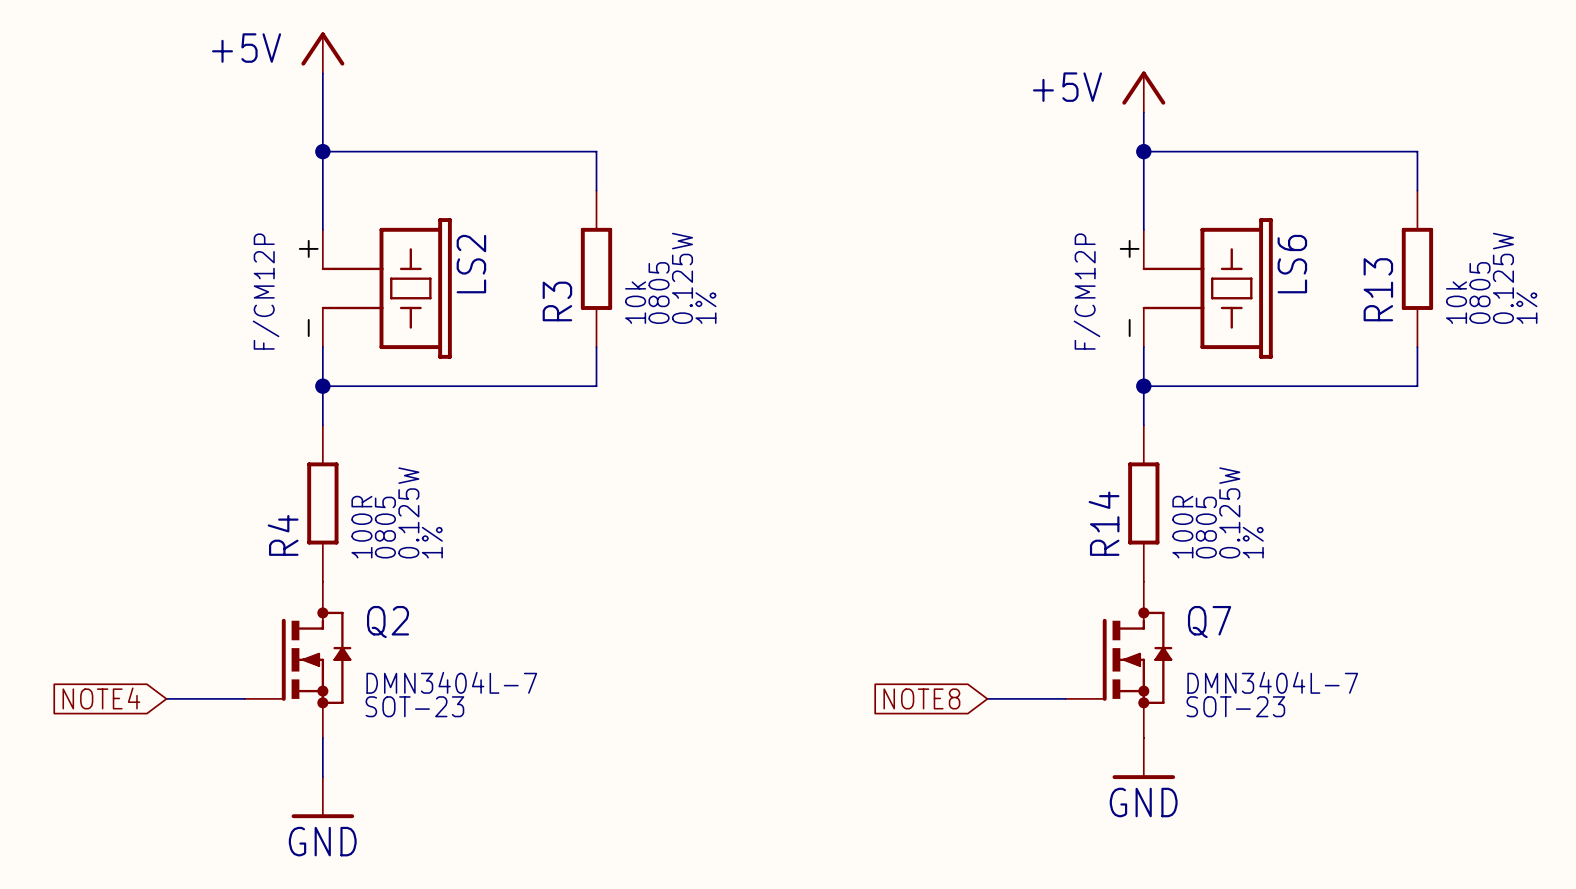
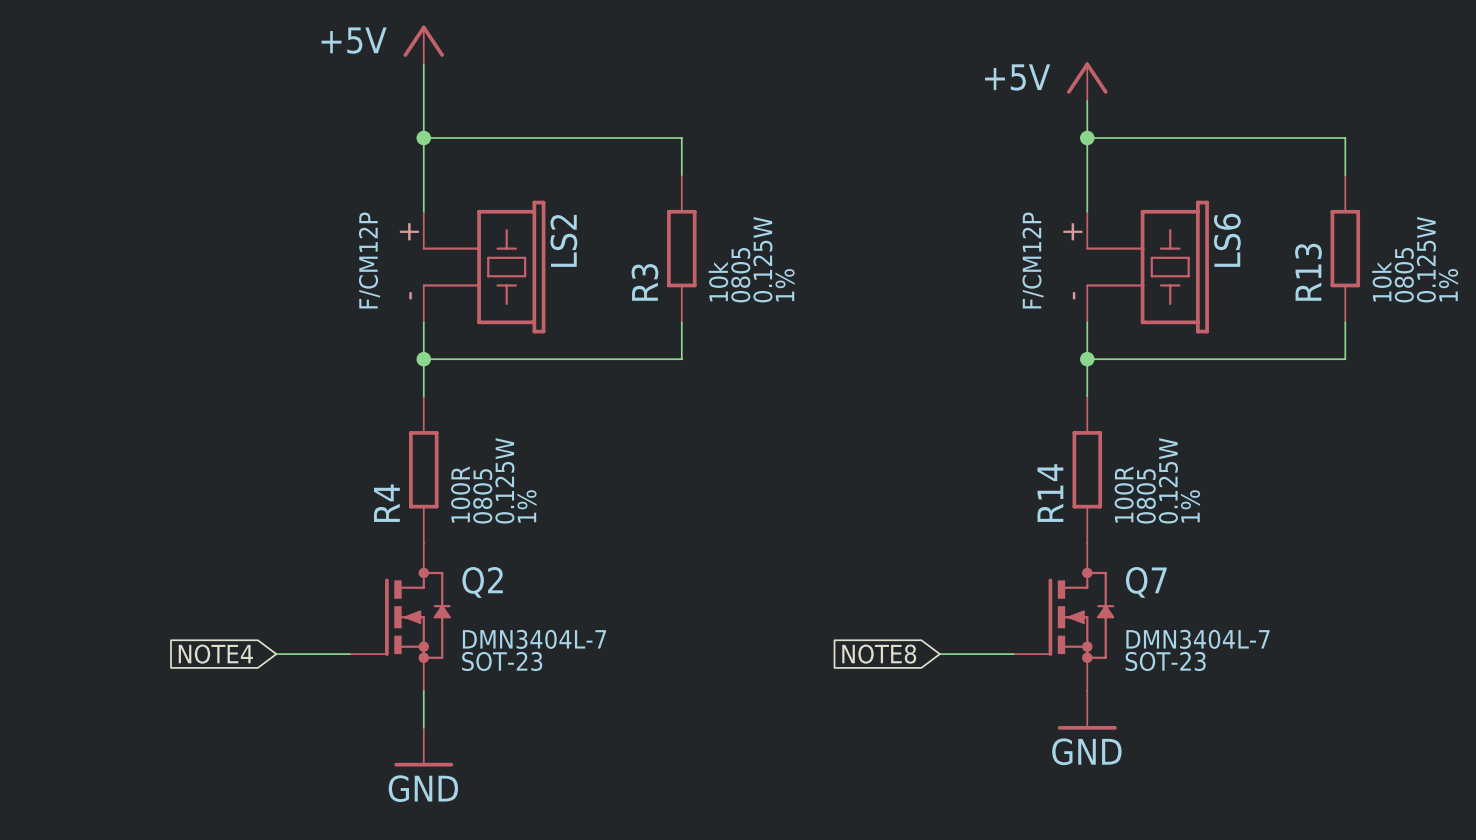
power symbol position: +5V (322, 52) -> +5V (423, 44)
wire: (322, 73) (322, 229) -> (423, 64) (423, 211)
wire: (322, 151) (440, 151) -> none
junction: (322, 151) -> none
junction: none -> (423, 138)
wire: (596, 151) (596, 190) -> (571, 138) (681, 138) (681, 174)
R3 position: (596, 268) -> (681, 248)
LS2 position: (386, 288) -> (484, 267)
wire: (322, 347) (322, 425) -> (423, 322) (423, 396)
wire: (596, 347) (596, 386) -> (681, 322) (681, 359) (571, 359)
wire: (322, 386) (440, 386) -> none
junction: (322, 386) -> none
junction: none -> (423, 359)
R4 position: (322, 503) -> (423, 469)
Q2 position: (298, 659) -> (400, 617)
global label position: NOTE4 (101, 698) -> NOTE4 (215, 654)
wire: (166, 698) (244, 698) -> (276, 654) (350, 654)
wire: (322, 738) (322, 777) -> (423, 690) (423, 727)
power symbol position: GND (322, 797) -> GND (423, 747)

